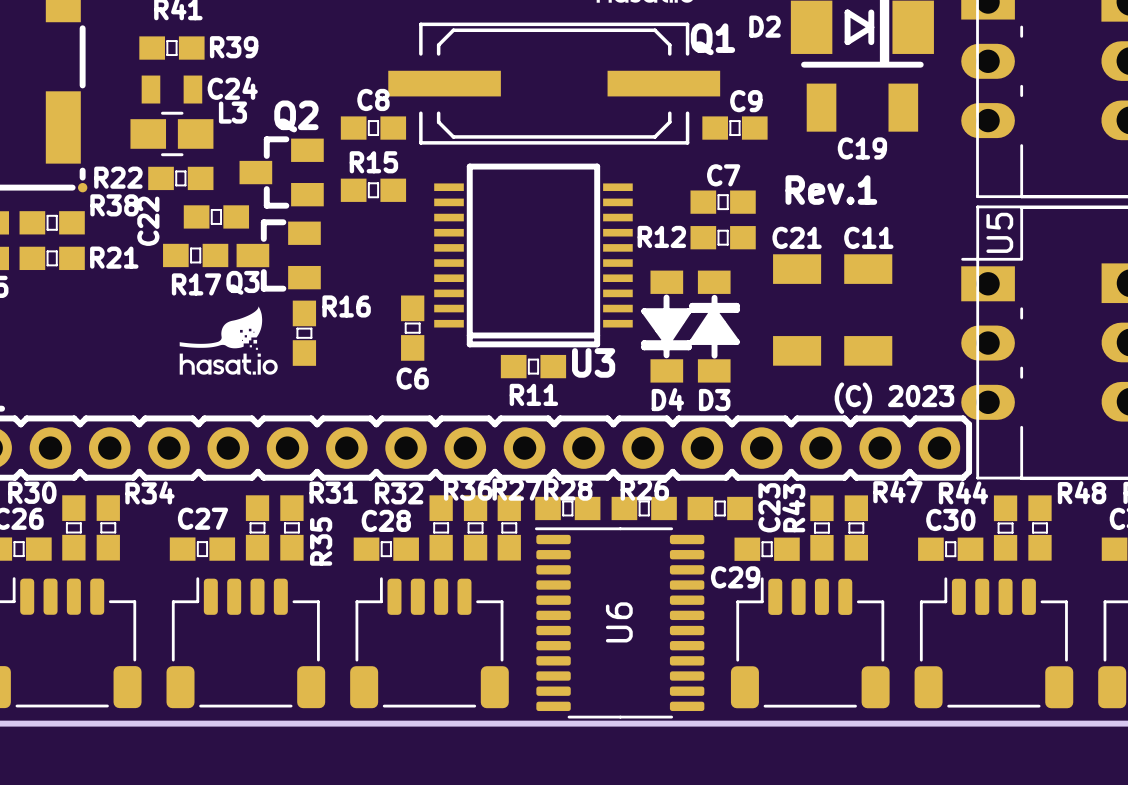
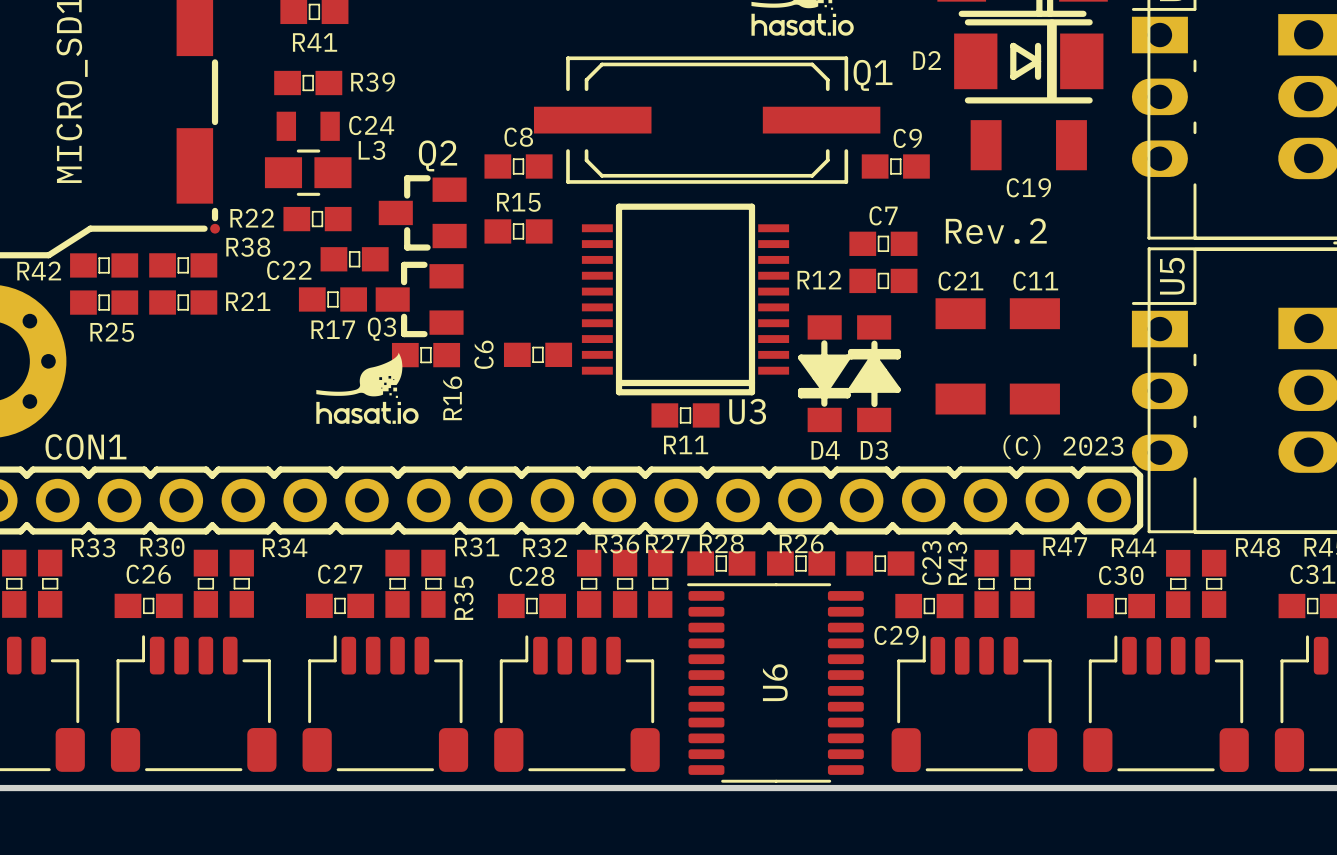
text: Rev.1 (831, 190) -> Rev.2 (996, 231)
C22 name rotation: 0° (148, 221) -> 90° clockwise (289, 270)
C6 rotation: 0° (412, 328) -> 90° clockwise (538, 354)
R16 rotation: 0° (304, 333) -> 90° clockwise (426, 355)

